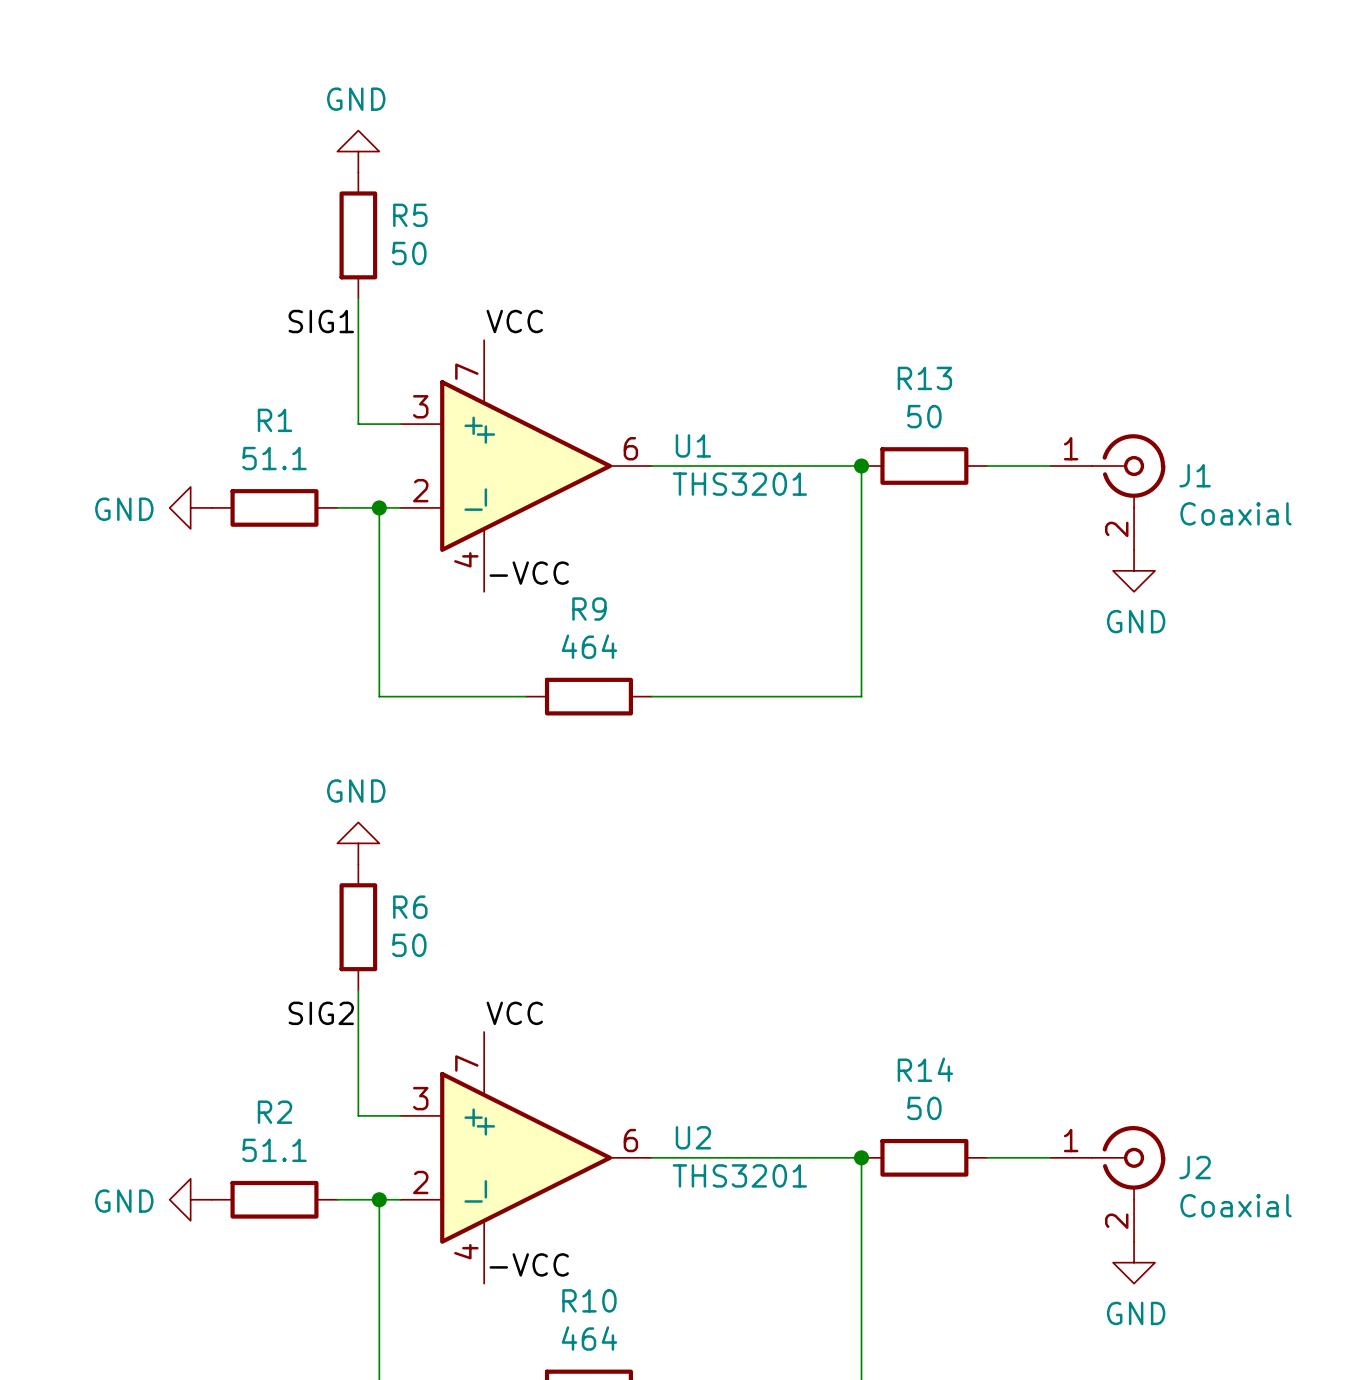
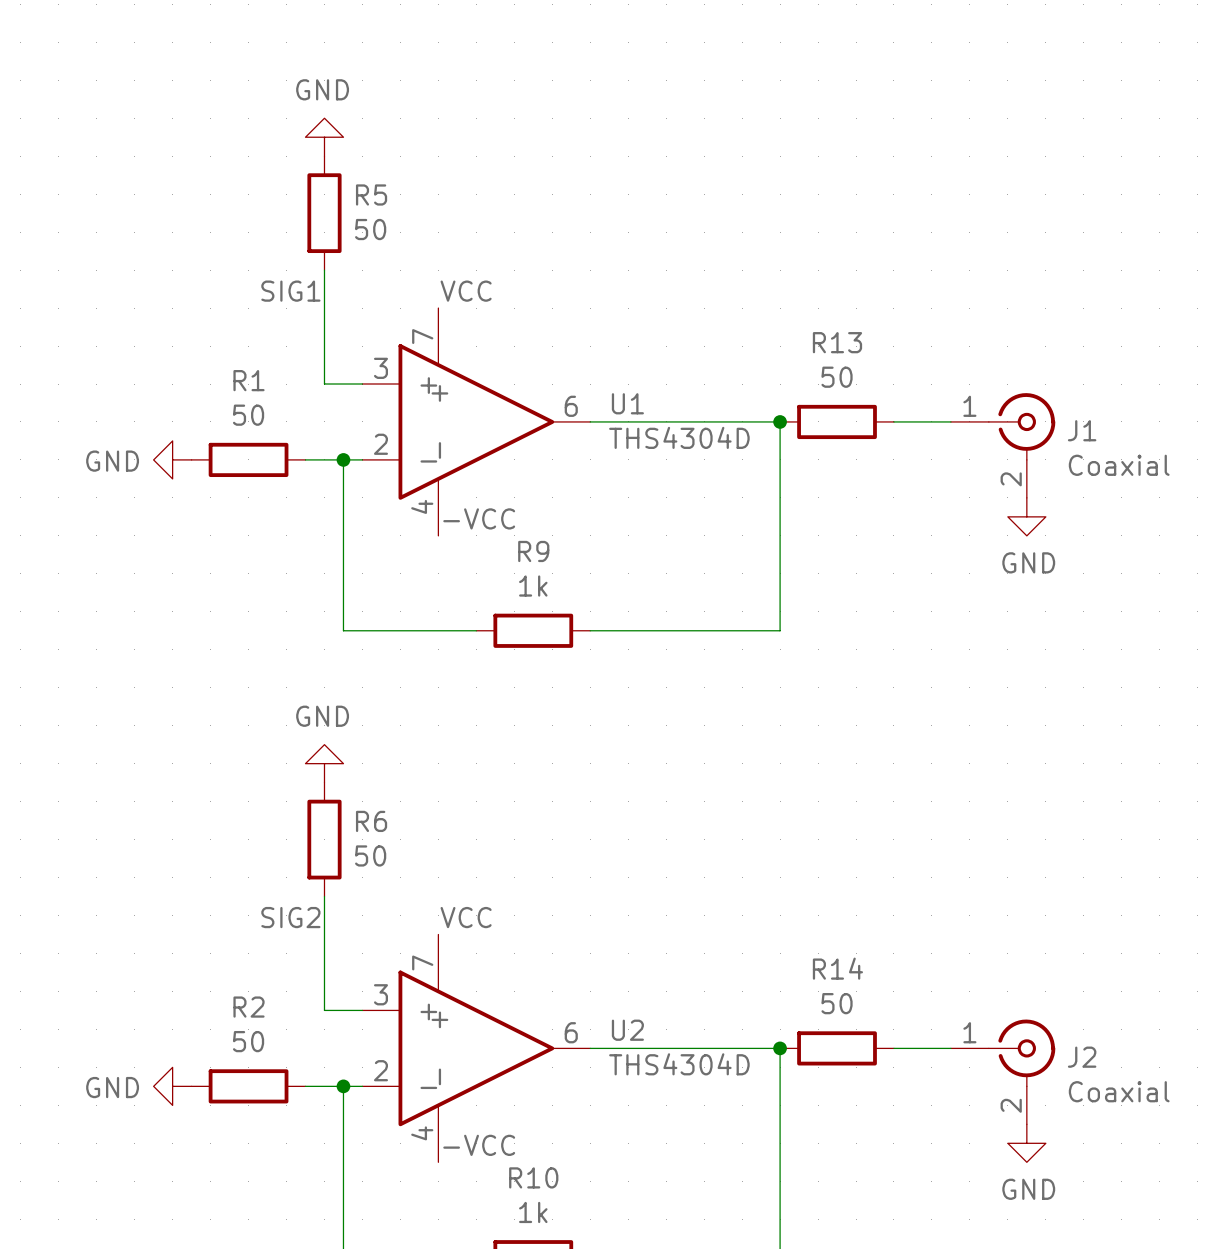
R1 value: 51.1 (274, 458) -> 50 (248, 415)
U1 value: THS3201 (739, 484) -> THS4304D (679, 437)
R9 value: 464 (589, 646) -> 1k (533, 586)
R2 value: 51.1 (274, 1150) -> 50 (248, 1041)
U2 value: THS3201 (739, 1175) -> THS4304D (679, 1064)
R10 value: 464 (589, 1338) -> 1k (533, 1212)

